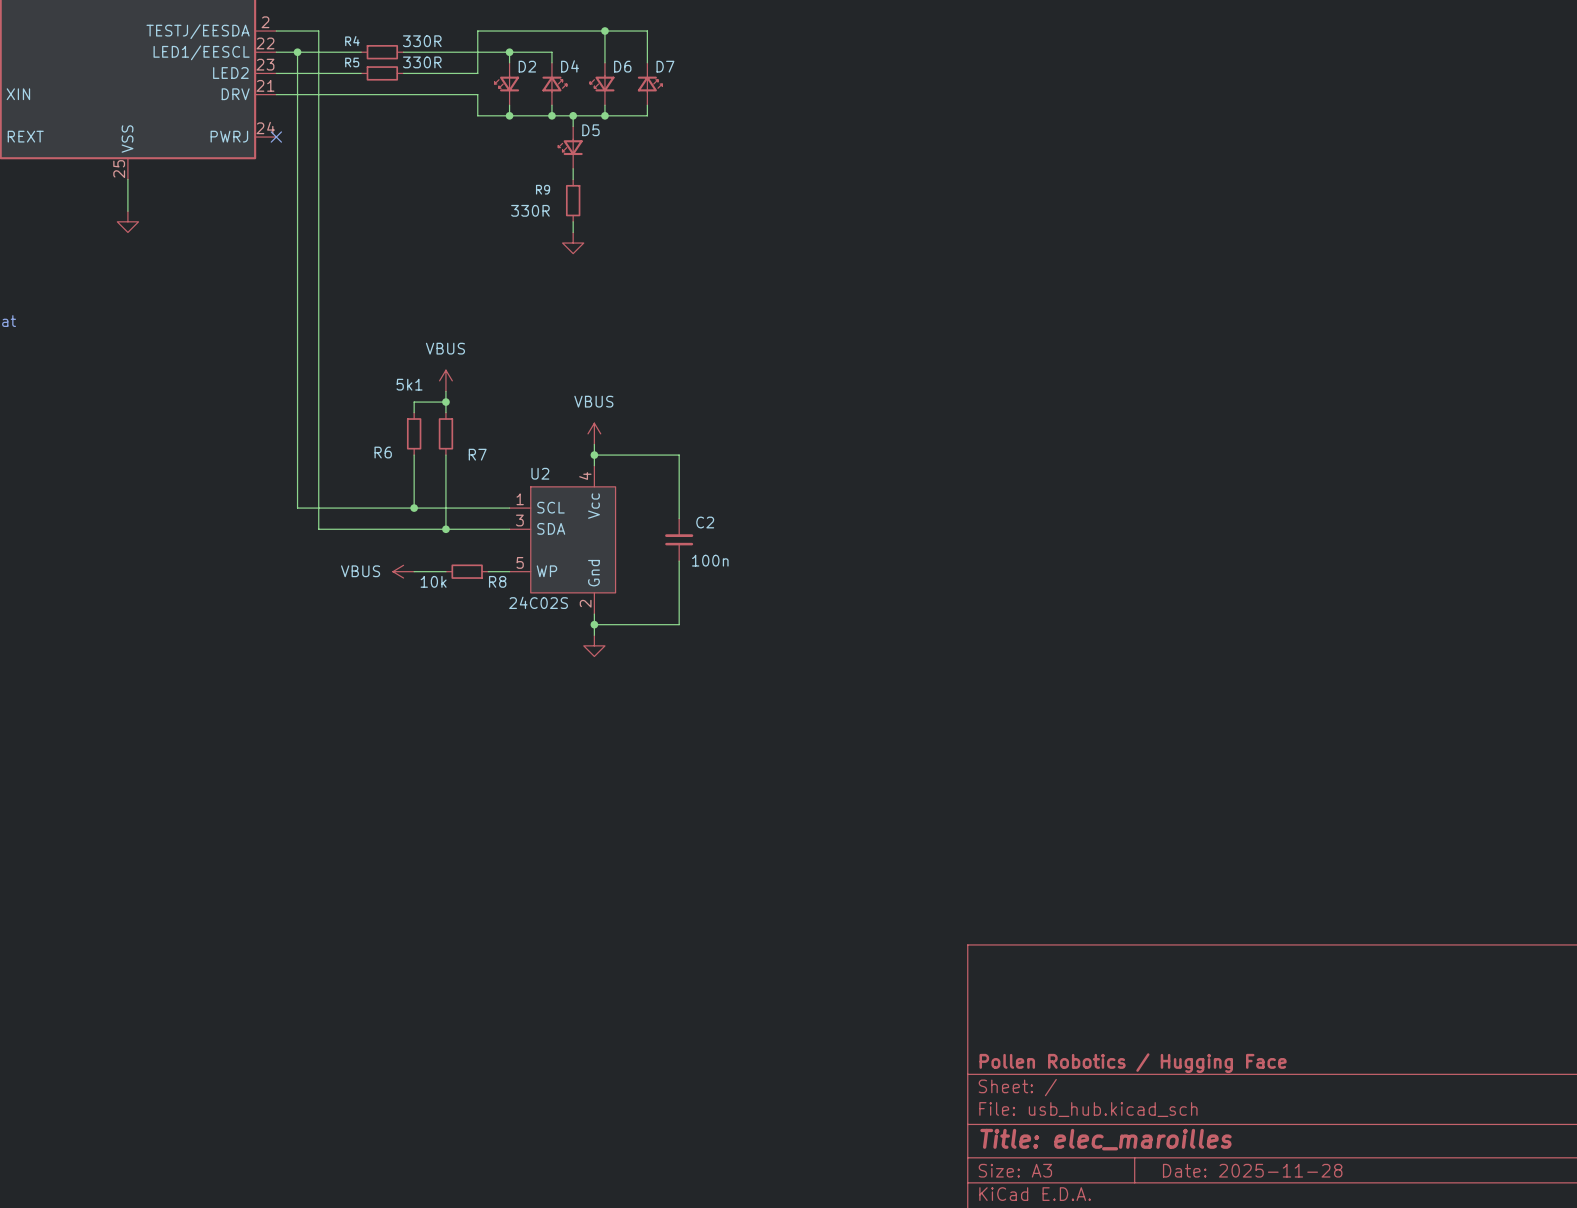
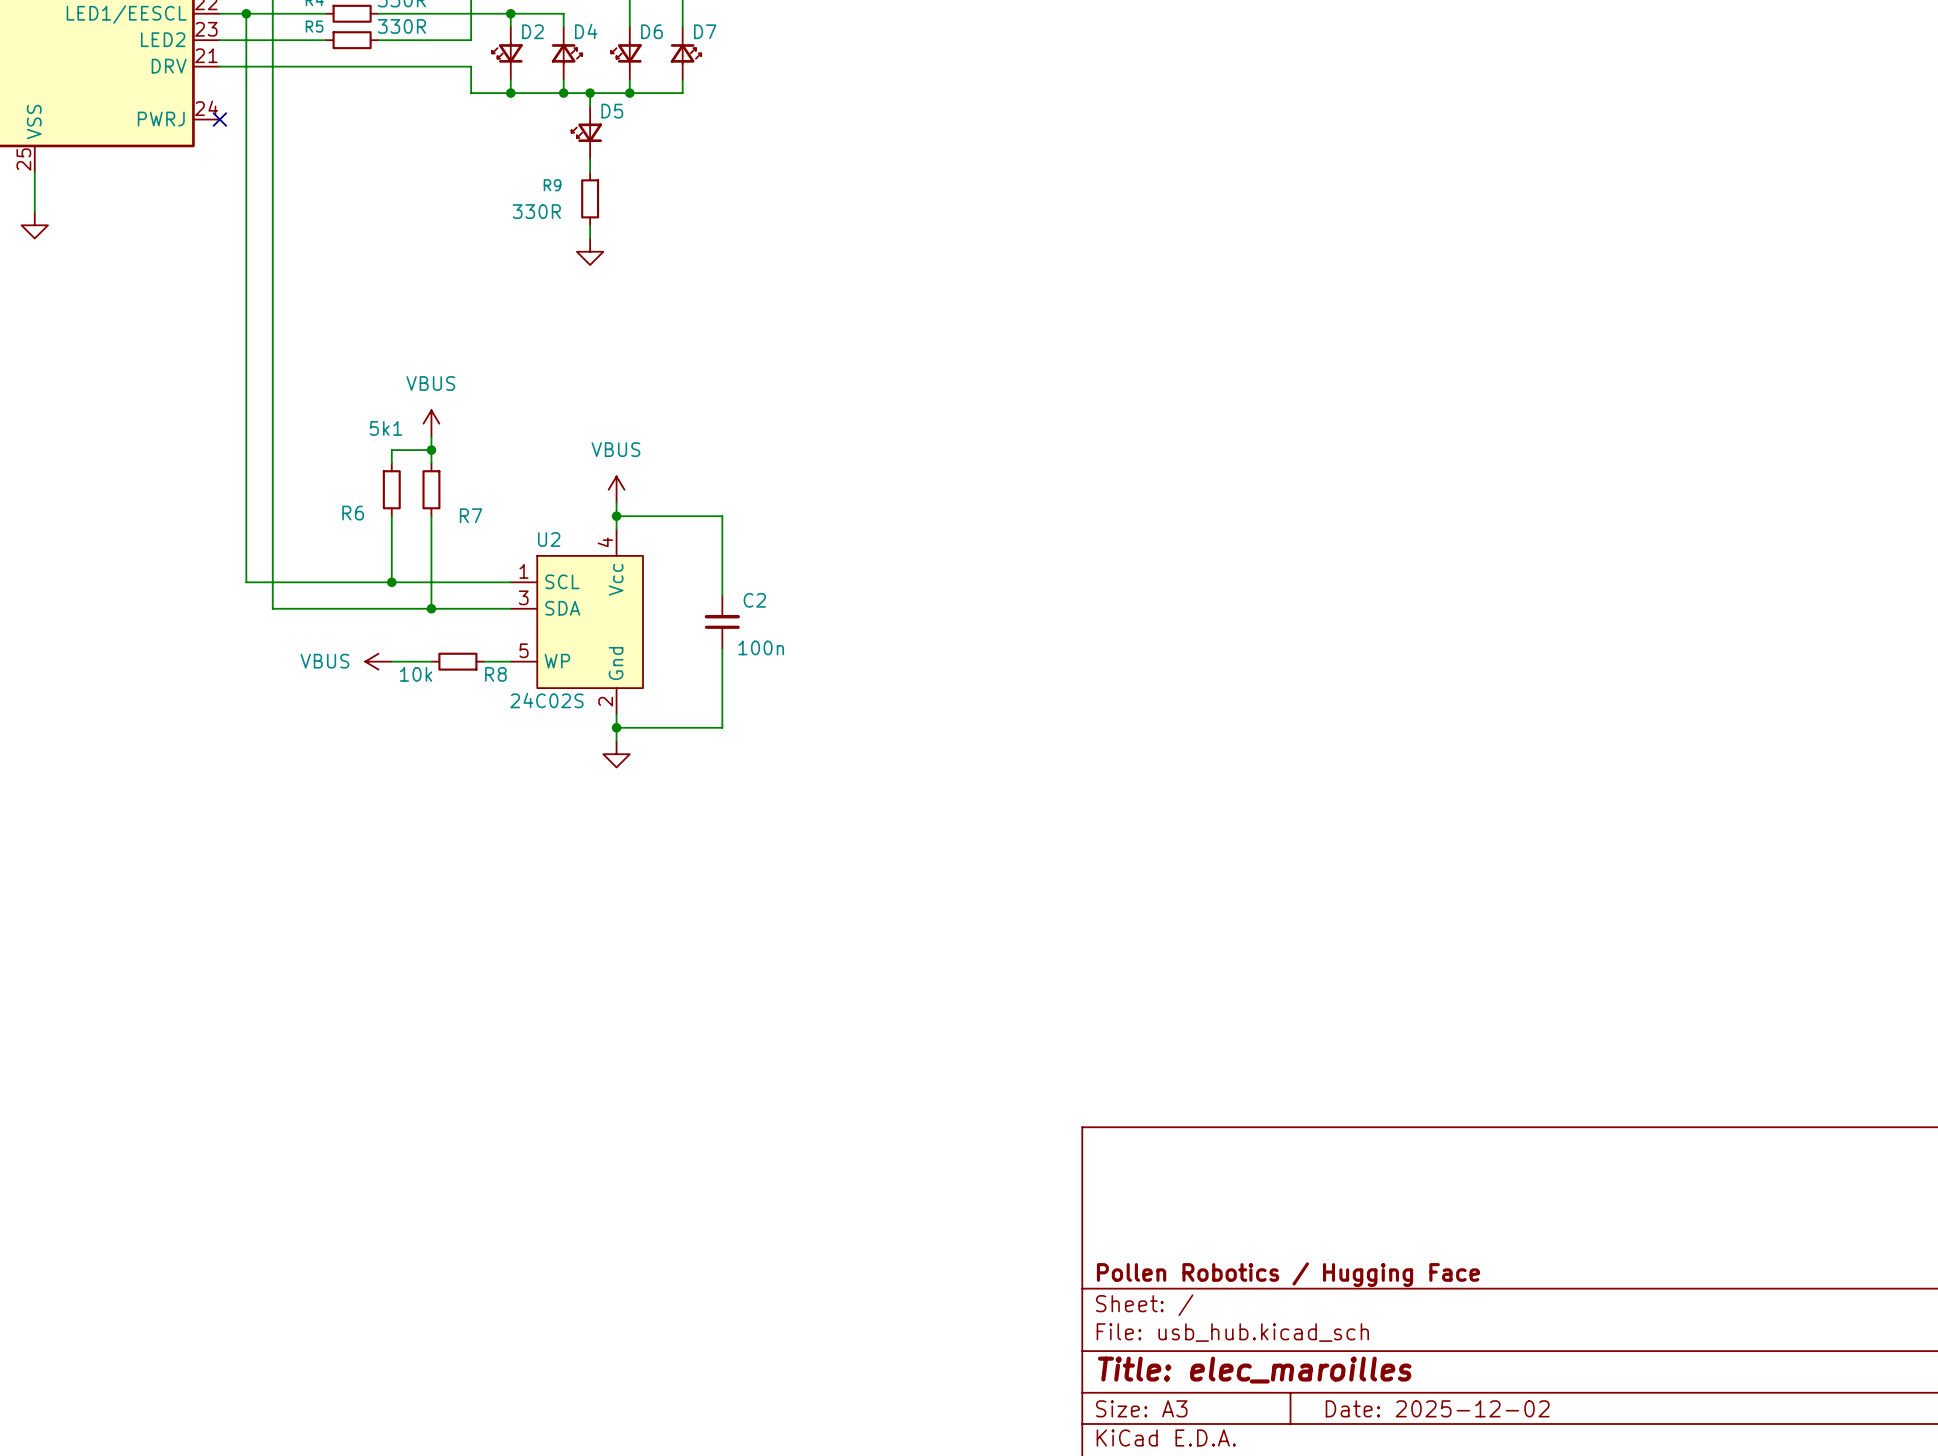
title block: Date: 2025-11-28 (1252, 1170) -> Date: 2025-12-02 (1437, 1408)

